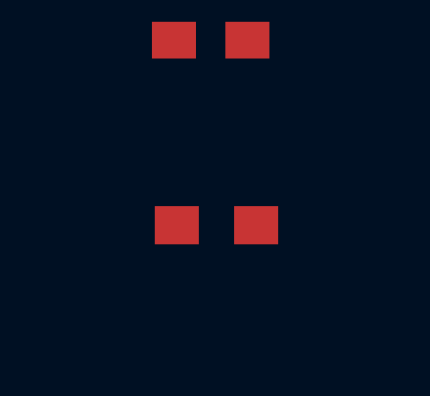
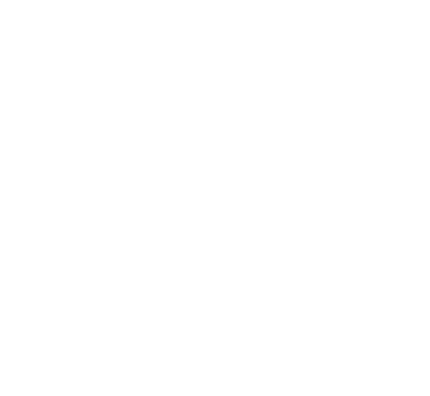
part: (210, 40) -> none
part: (216, 225) -> none

